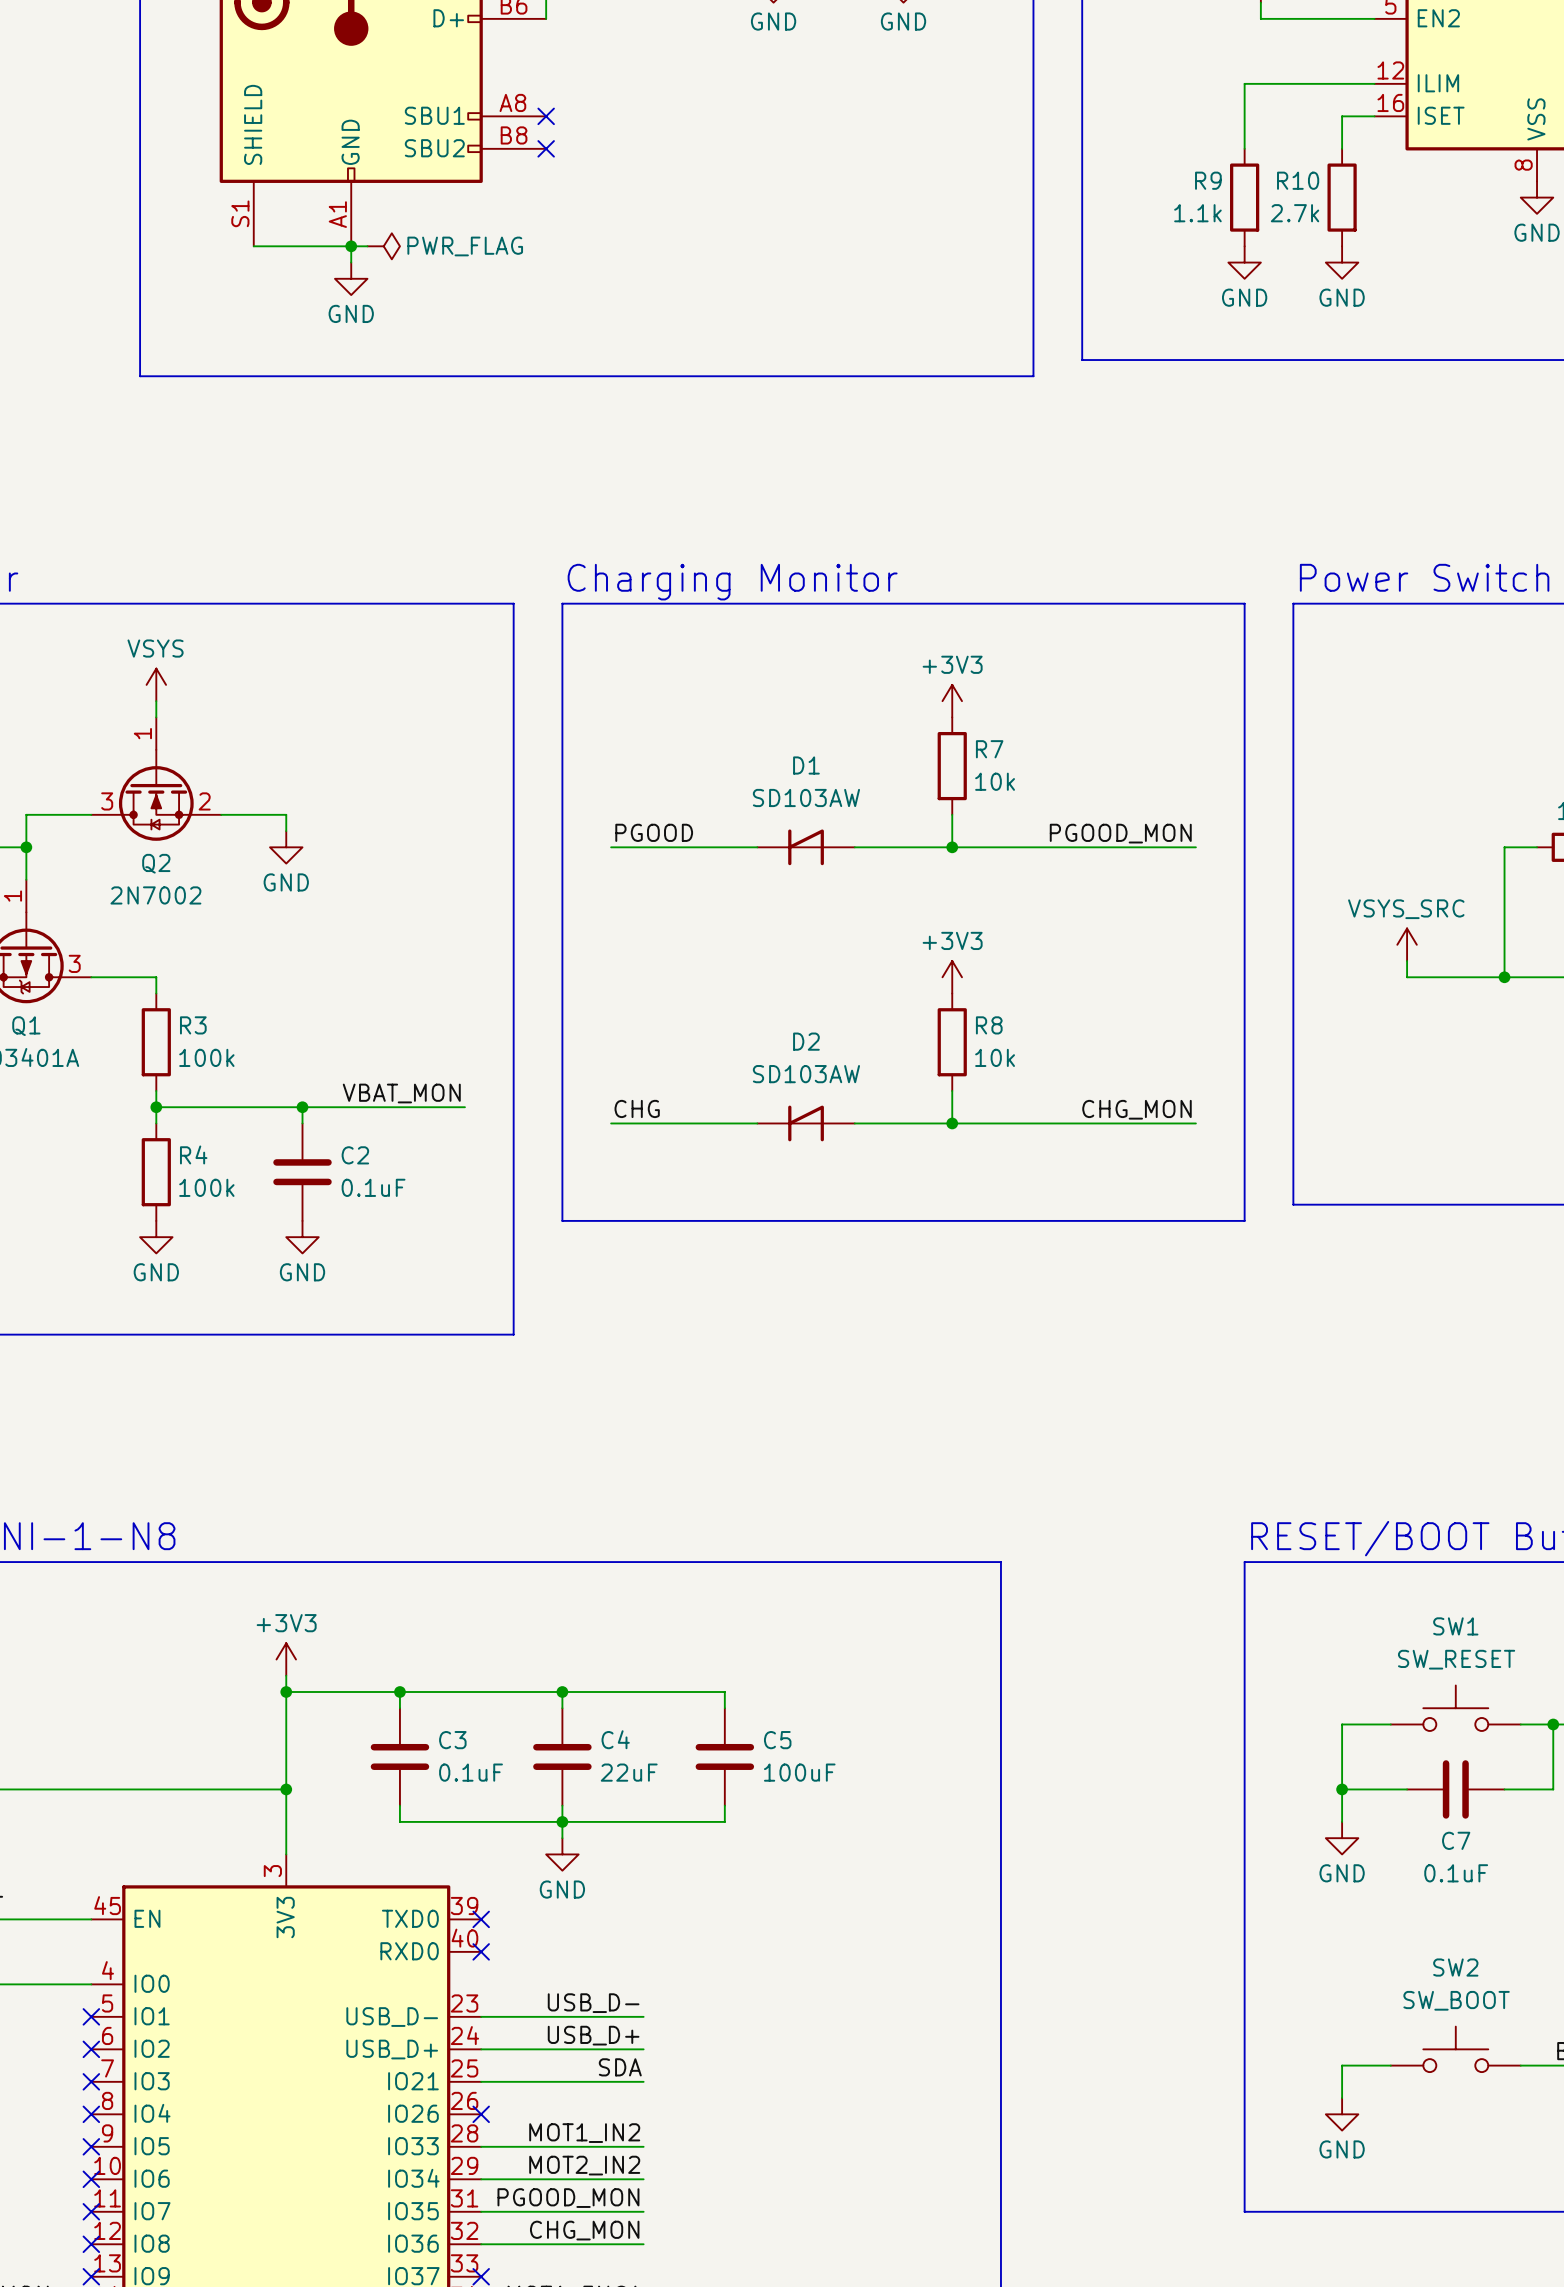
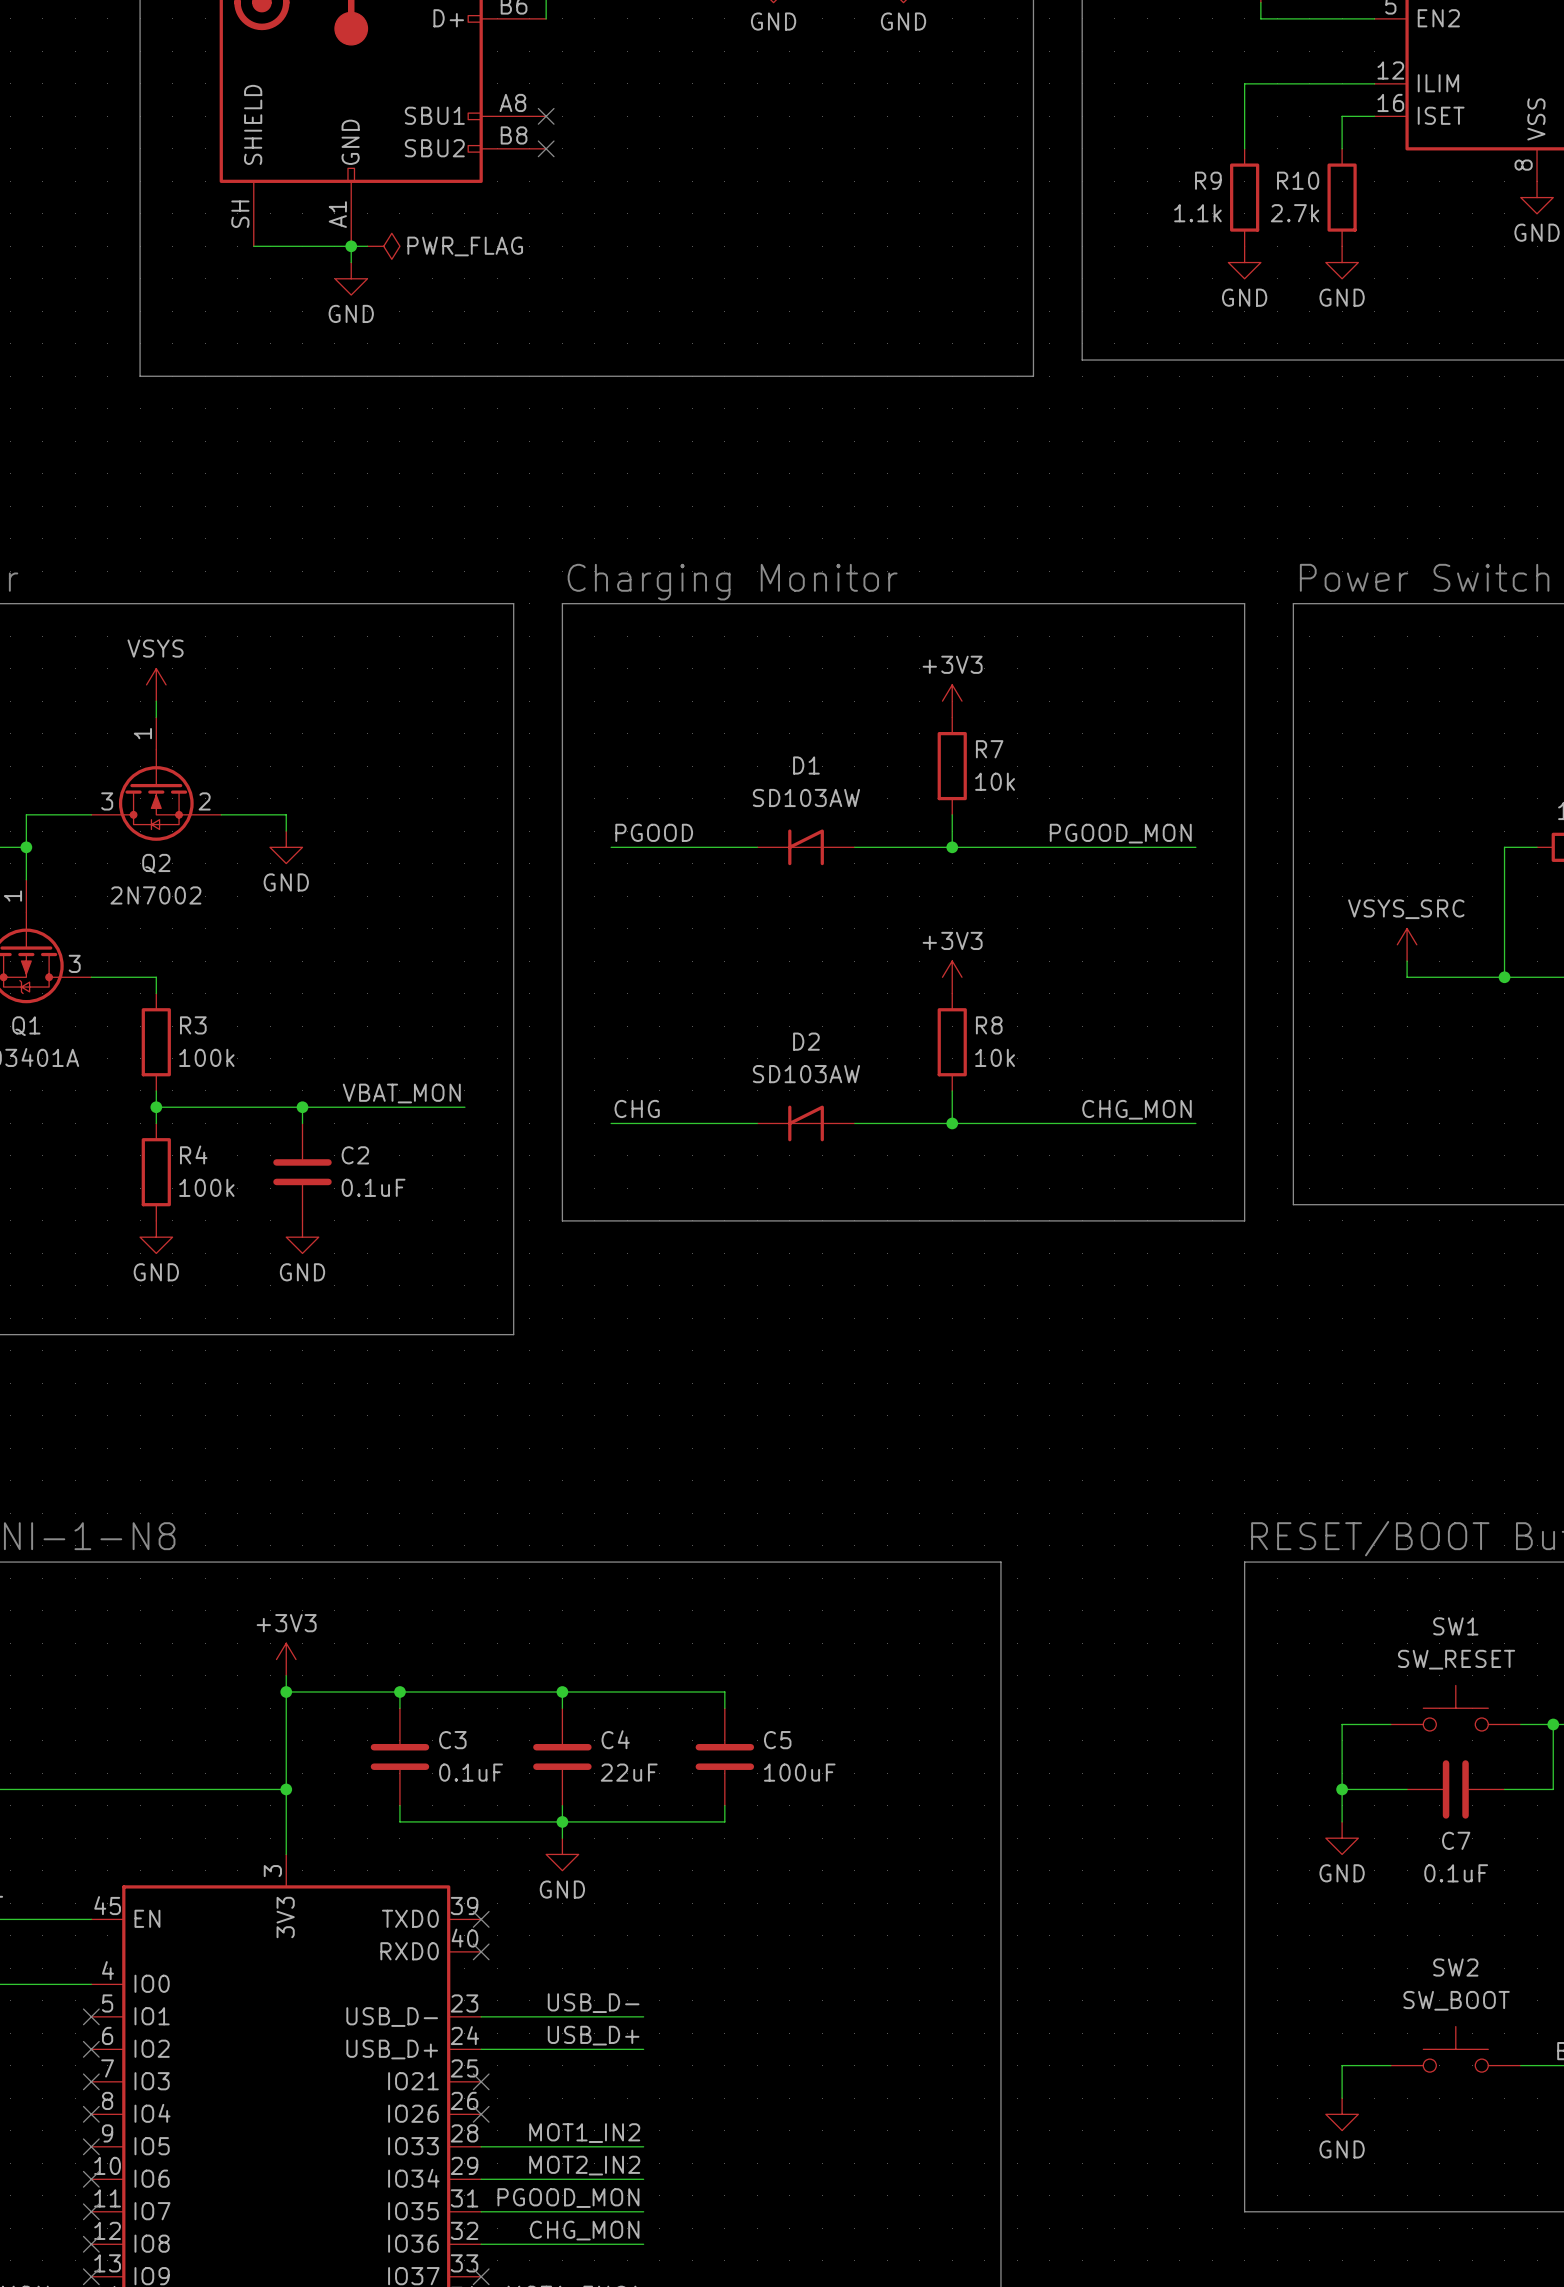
part pin number: S1 (240, 213) -> SH (240, 214)
label: SDA (620, 2067) -> none
wire: (481, 2081) (643, 2081) -> none
no-connect mark: none -> (481, 2081)

